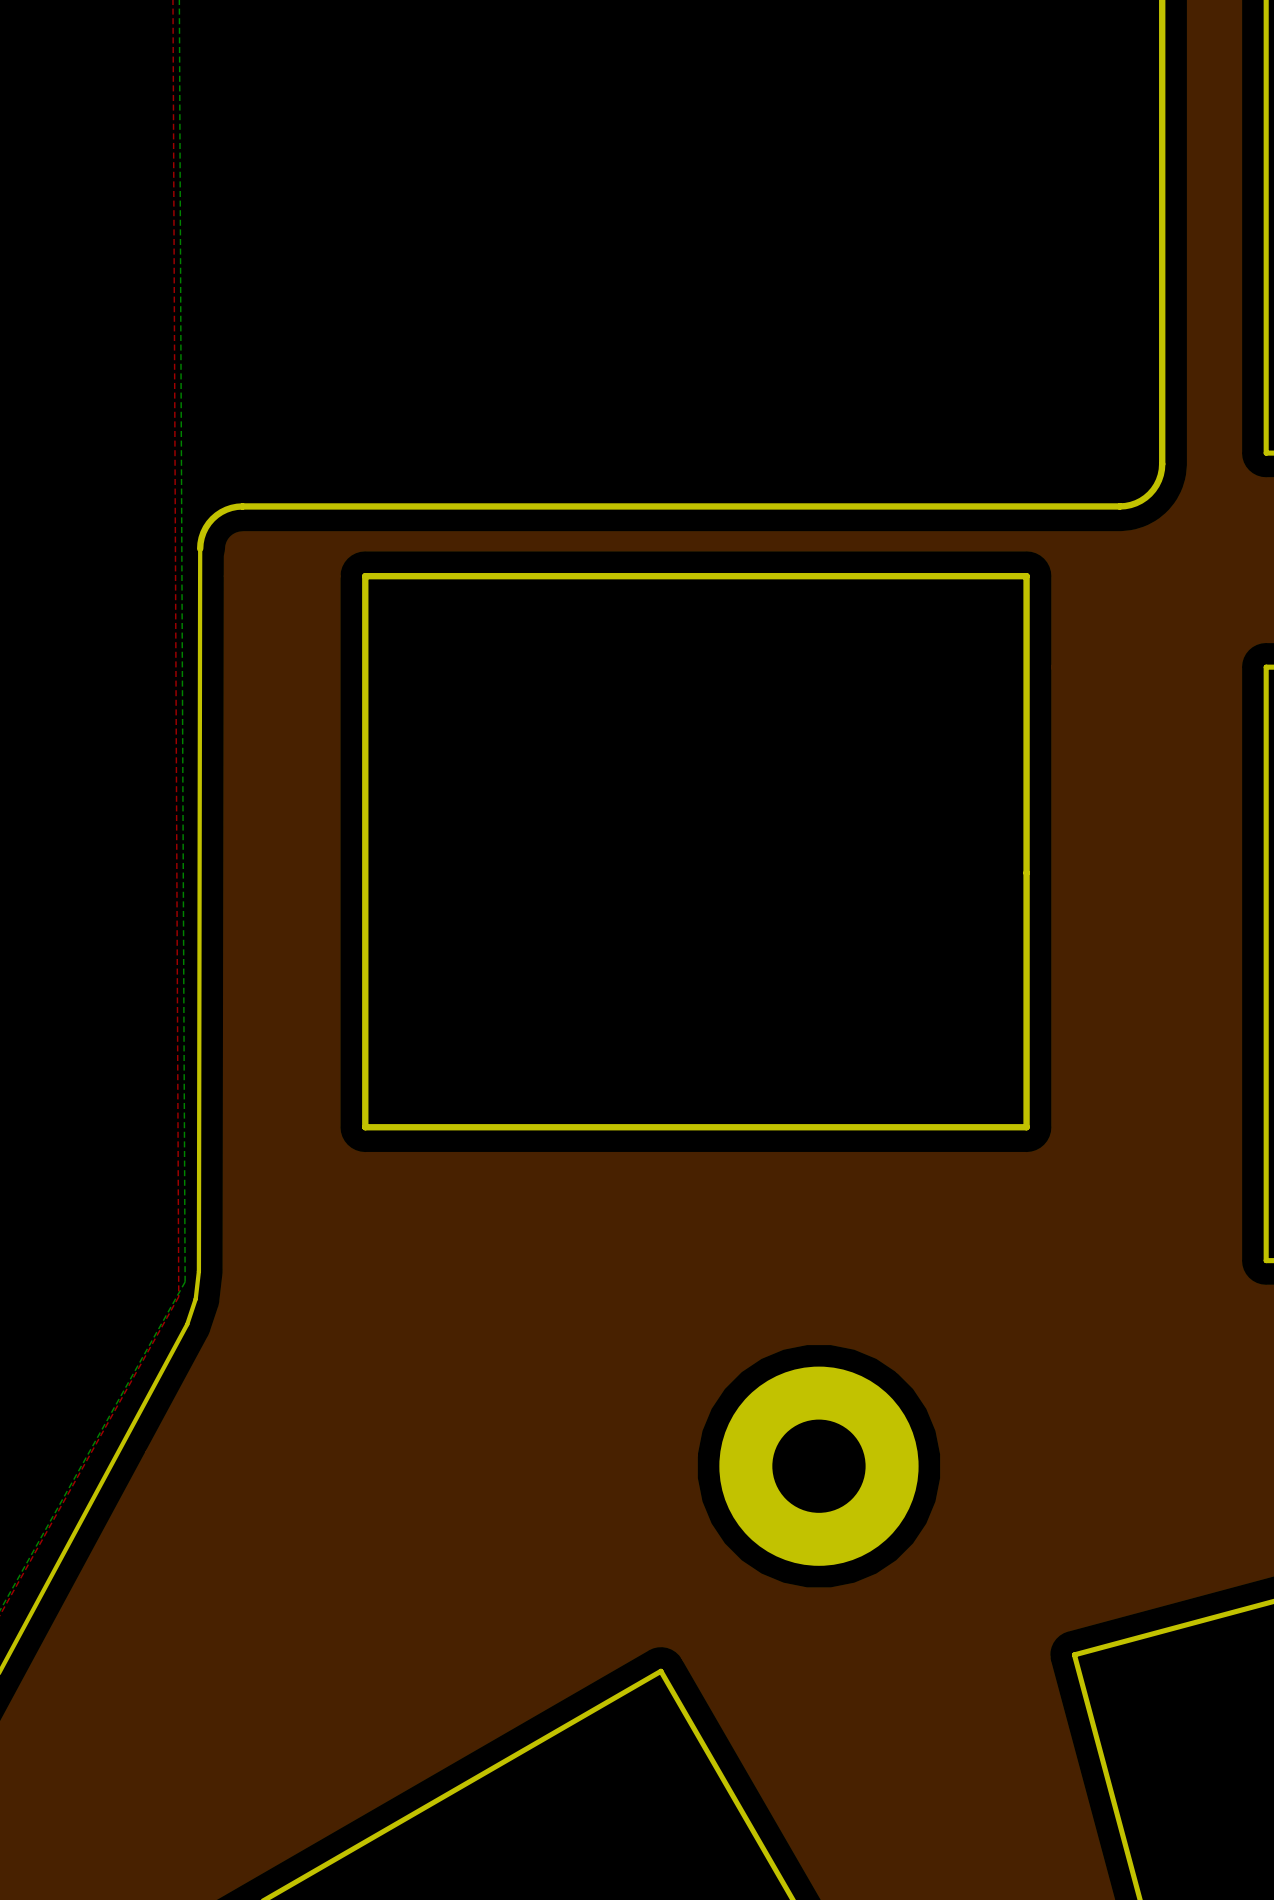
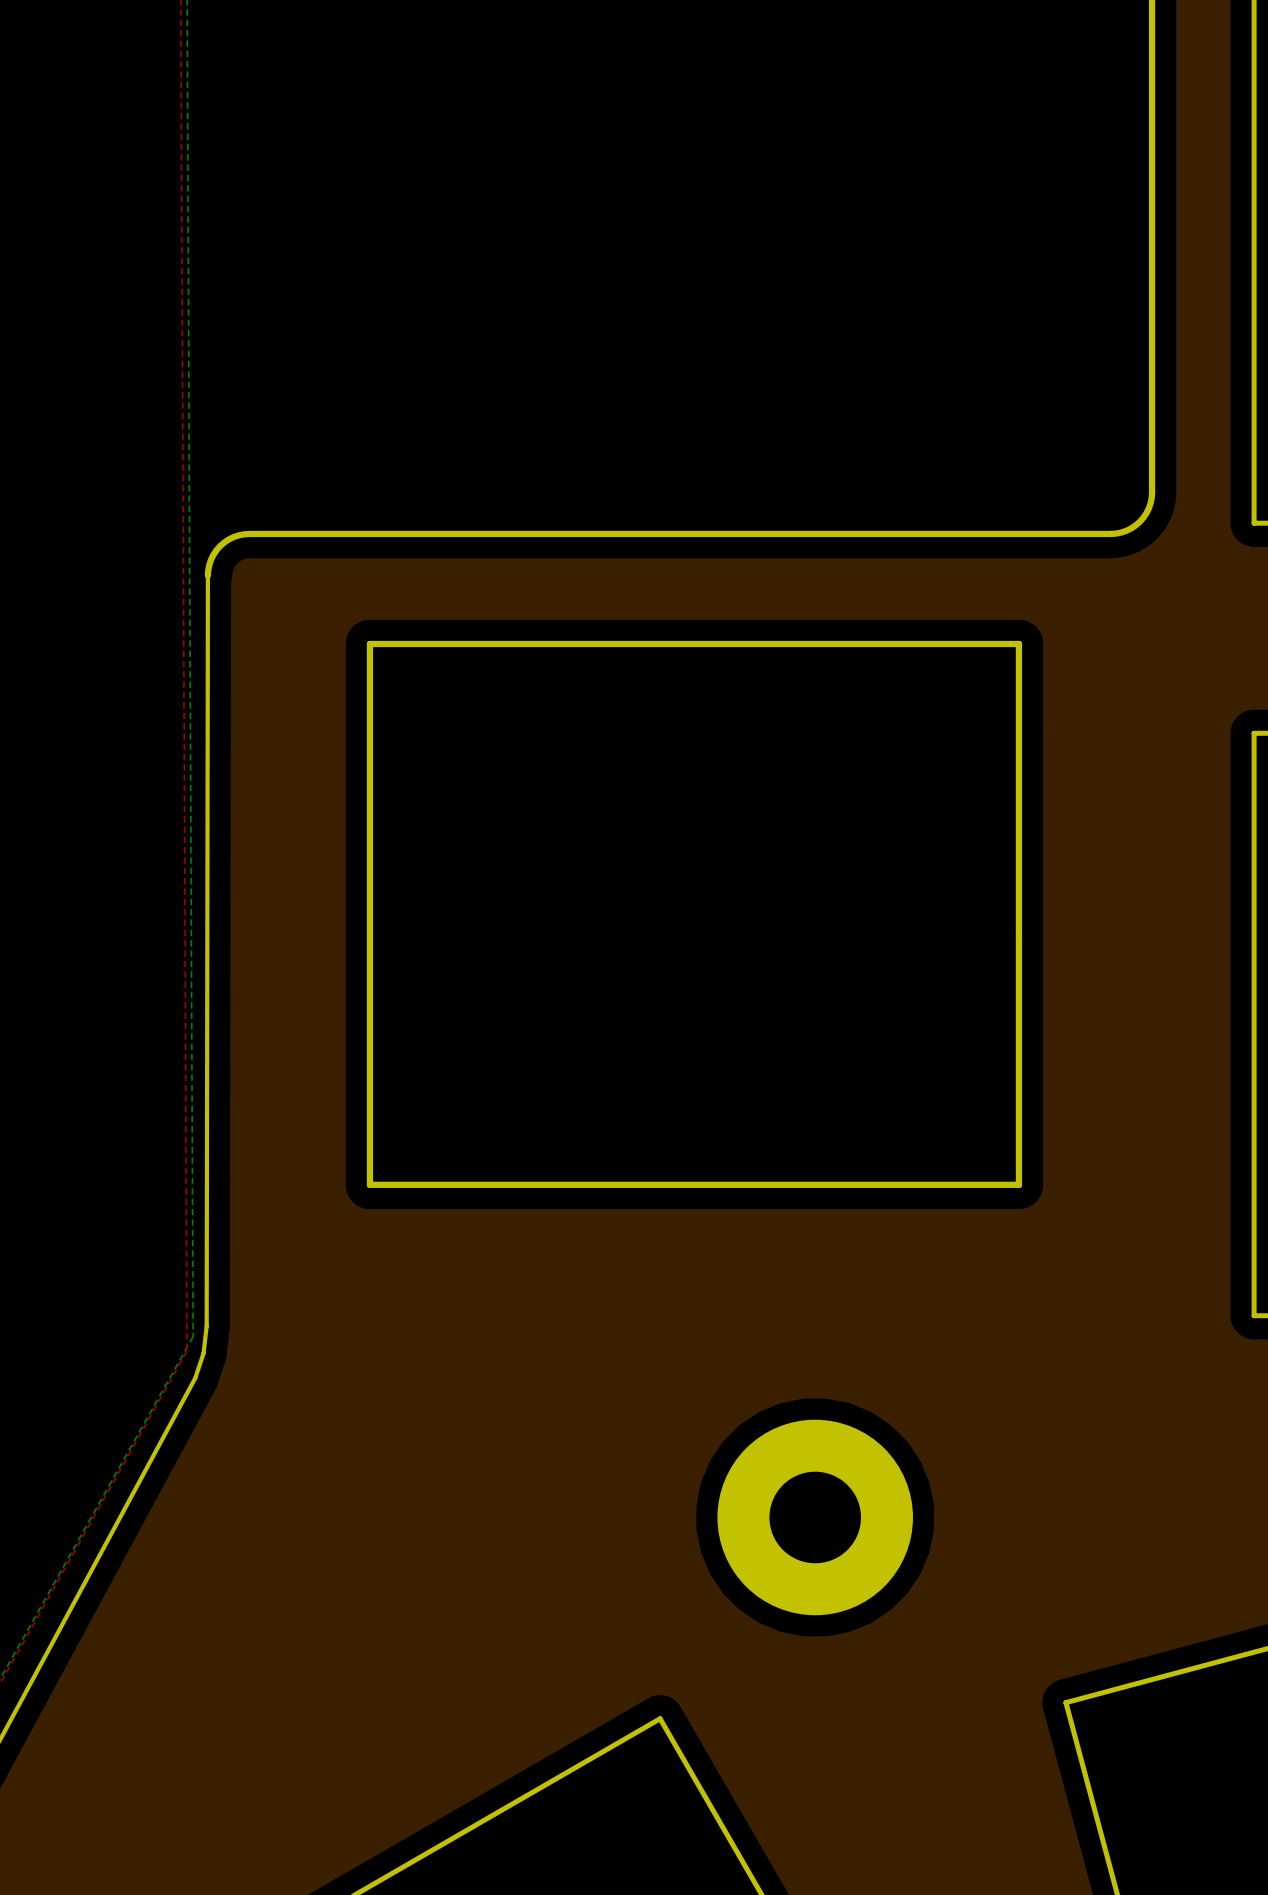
board edge: (1162, 421) (1162, 464) (1158, 480) (1145, 497) (1125, 506) (242, 506) (226, 509) (212, 518) (203, 532) (200, 548) (198, 1271) -> (1152, 492) (1148, 508) (1139, 521) (1126, 530) (1110, 533) (249, 533) (233, 537) (220, 546) (211, 559) (207, 575) (206, 1326)

